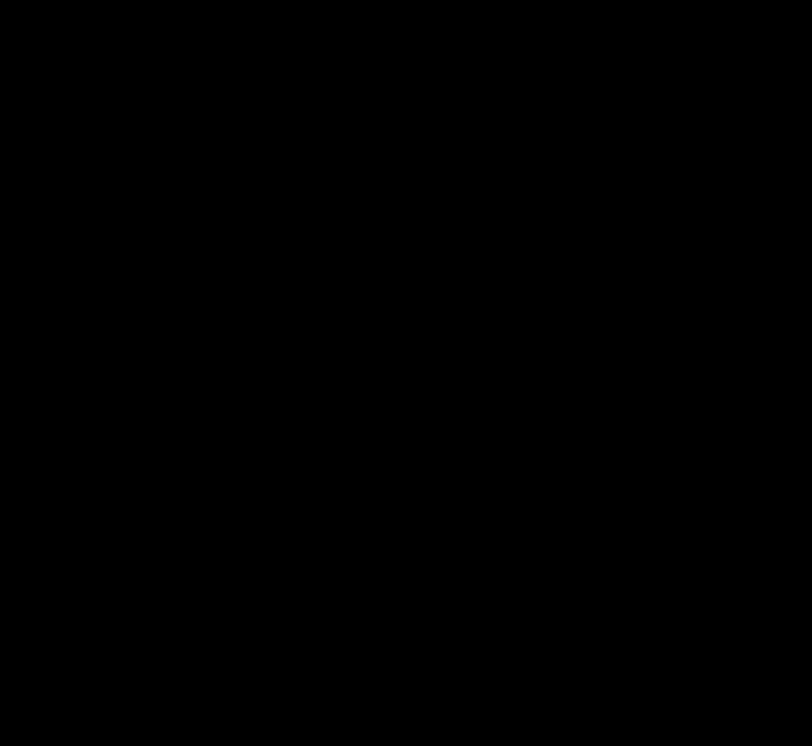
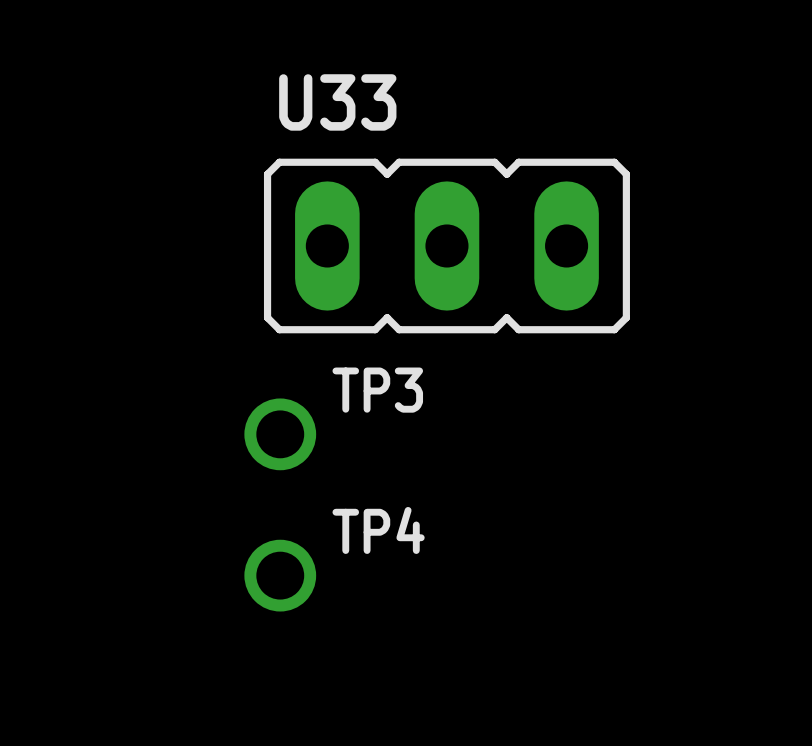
U33: none -> (446, 245)
TP3: none -> (280, 434)
TP4: none -> (280, 575)

